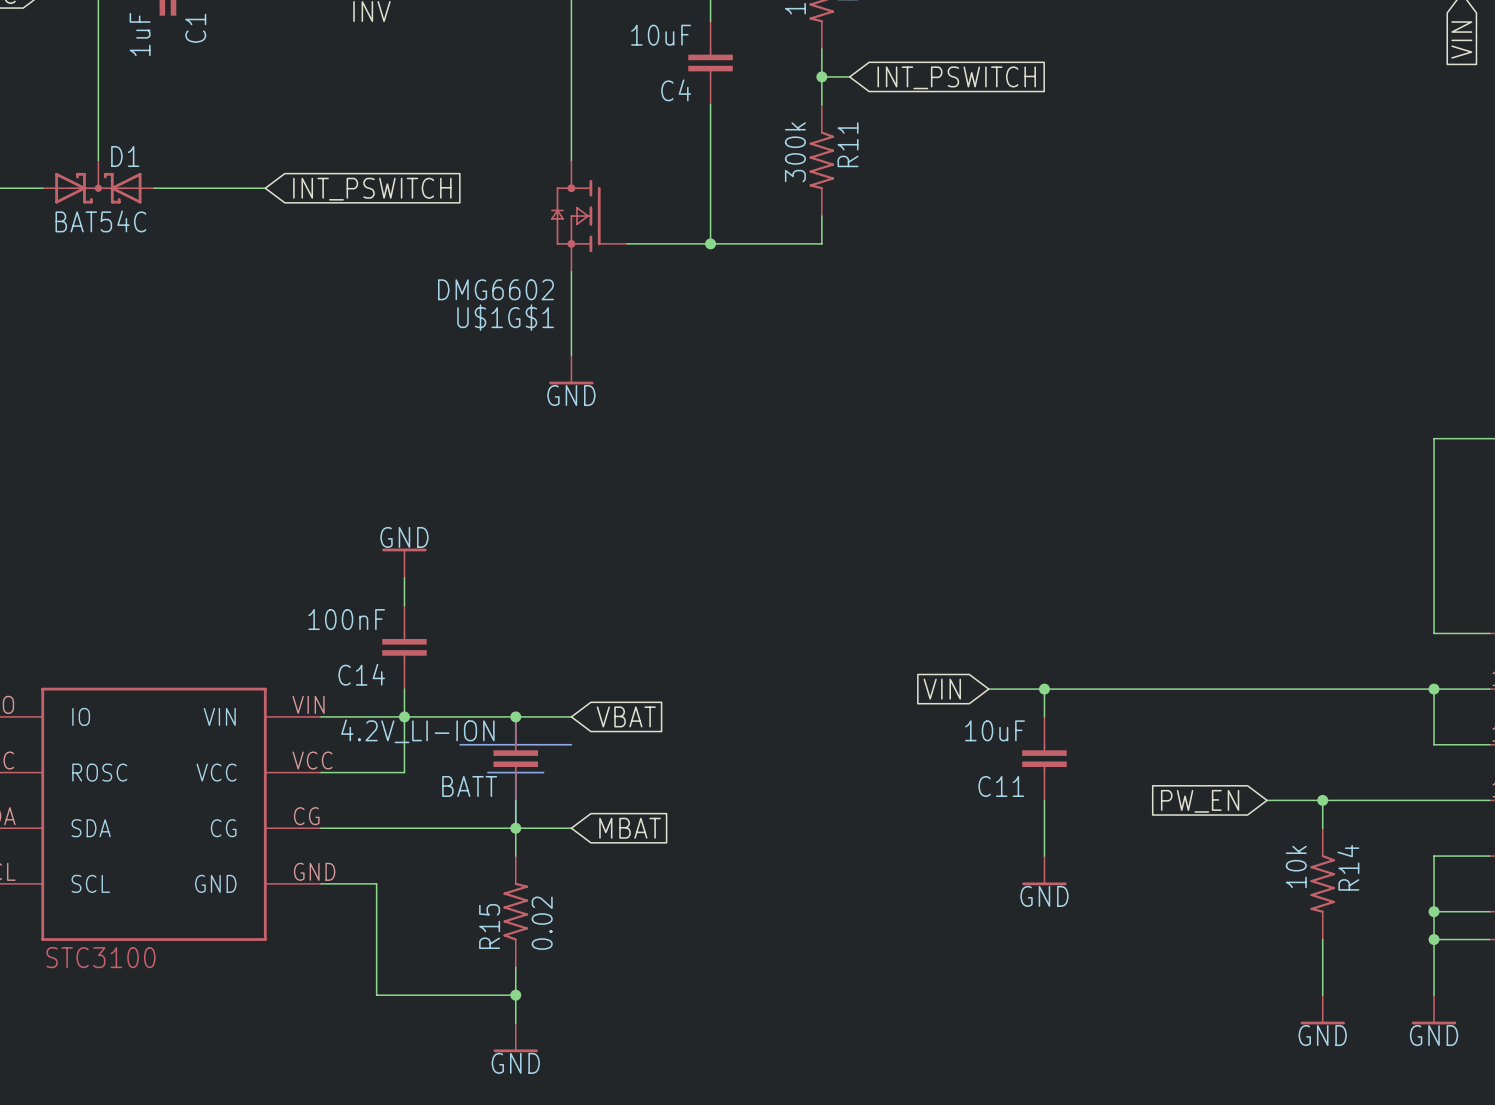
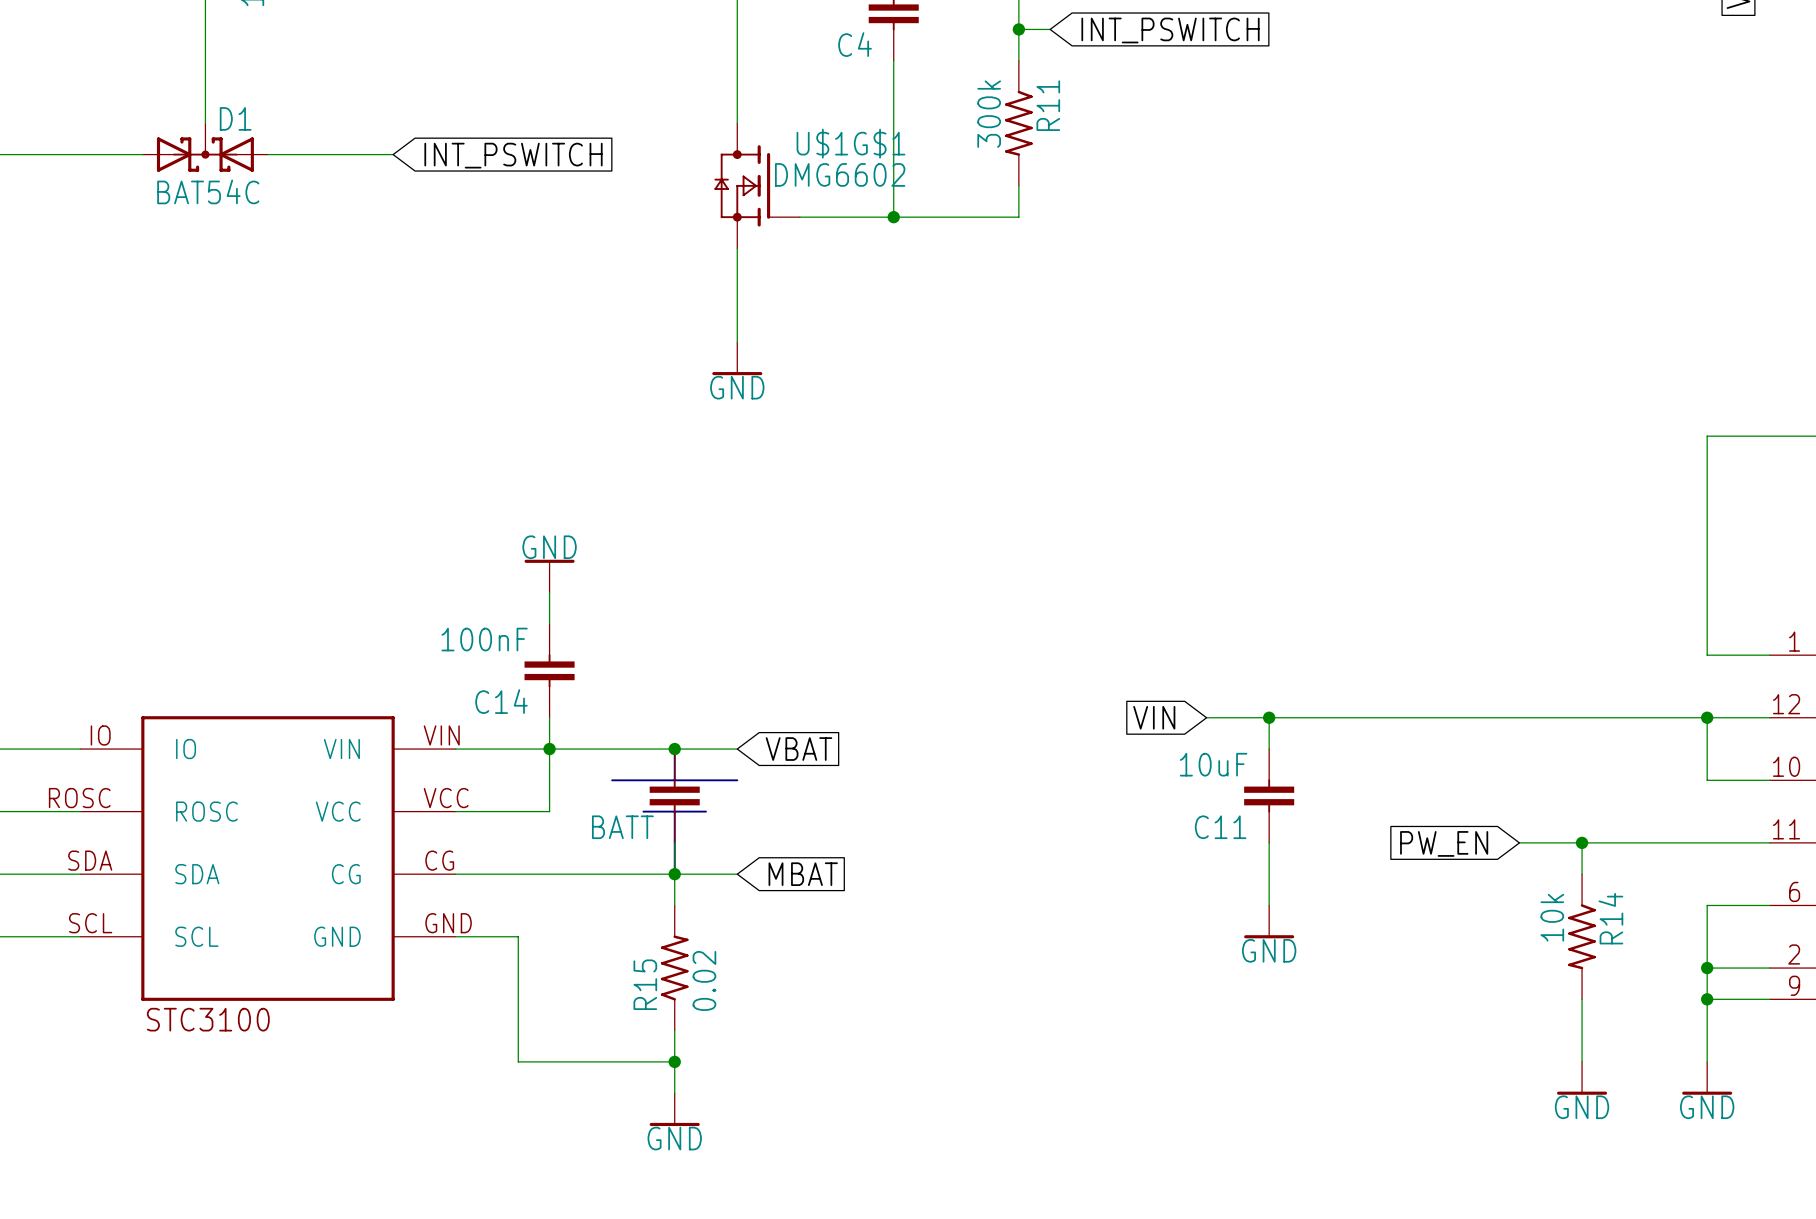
U$1G$1 value position: DMG6602 (495, 289) -> DMG6602 (840, 174)
U$1G$1 name position: U$1G$1 (505, 317) -> U$1G$1 (850, 143)
BATT value: 4.2V_LI-ION (417, 731) -> none

